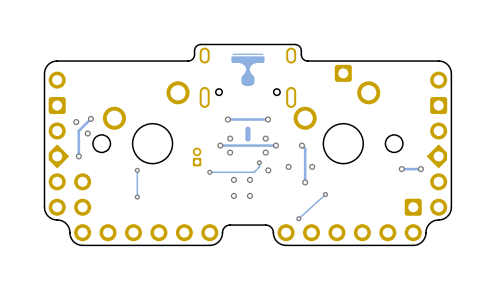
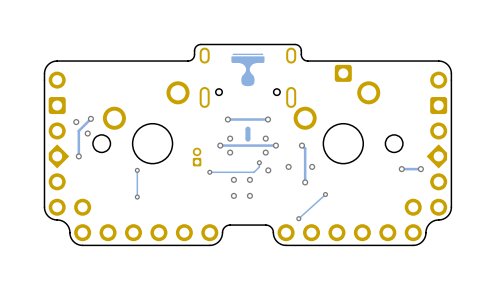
part footprint: [44, 71, 452, 246] -> [44, 71, 452, 246]

